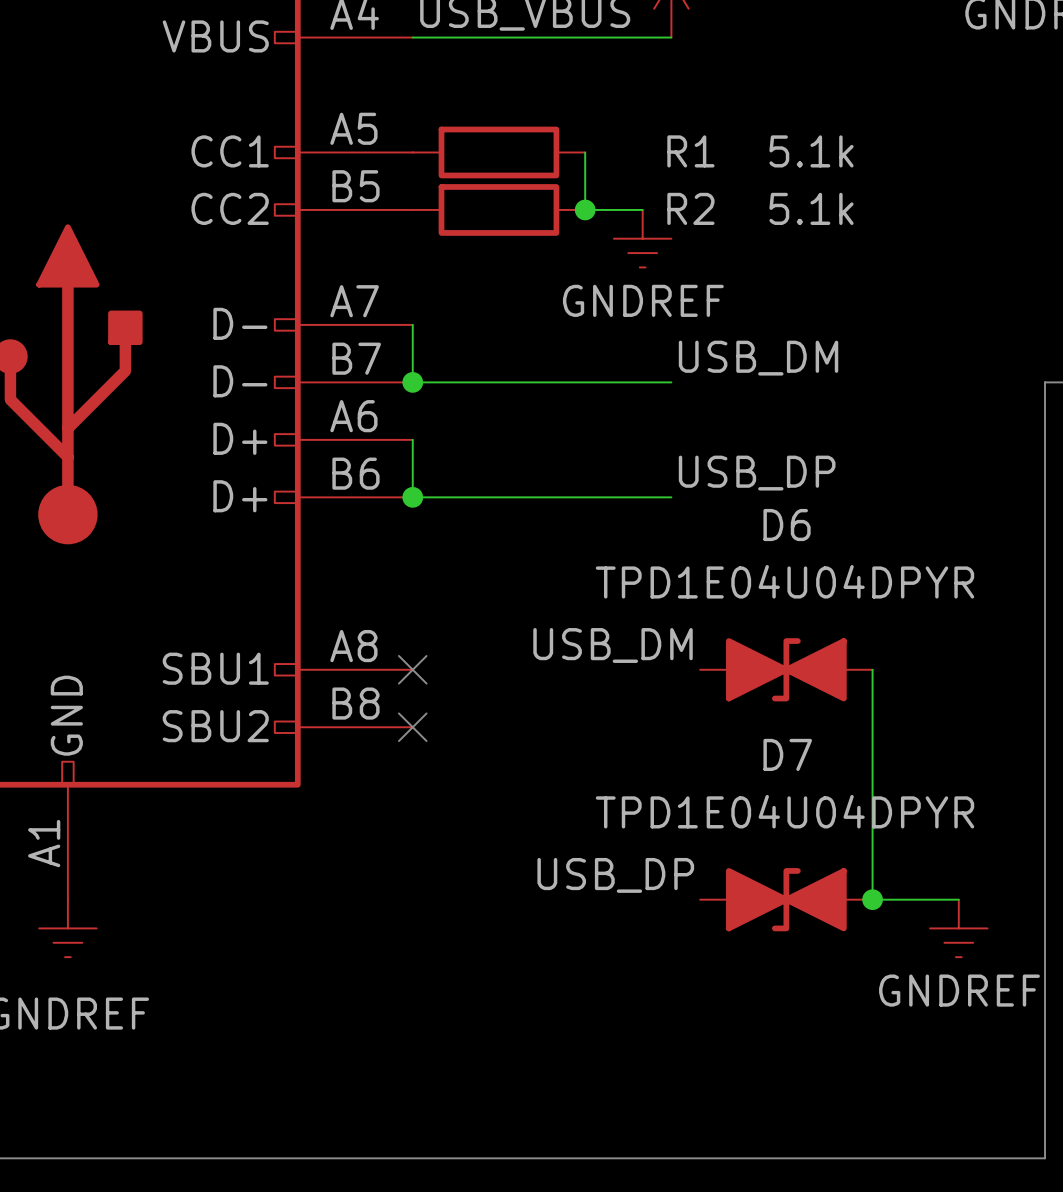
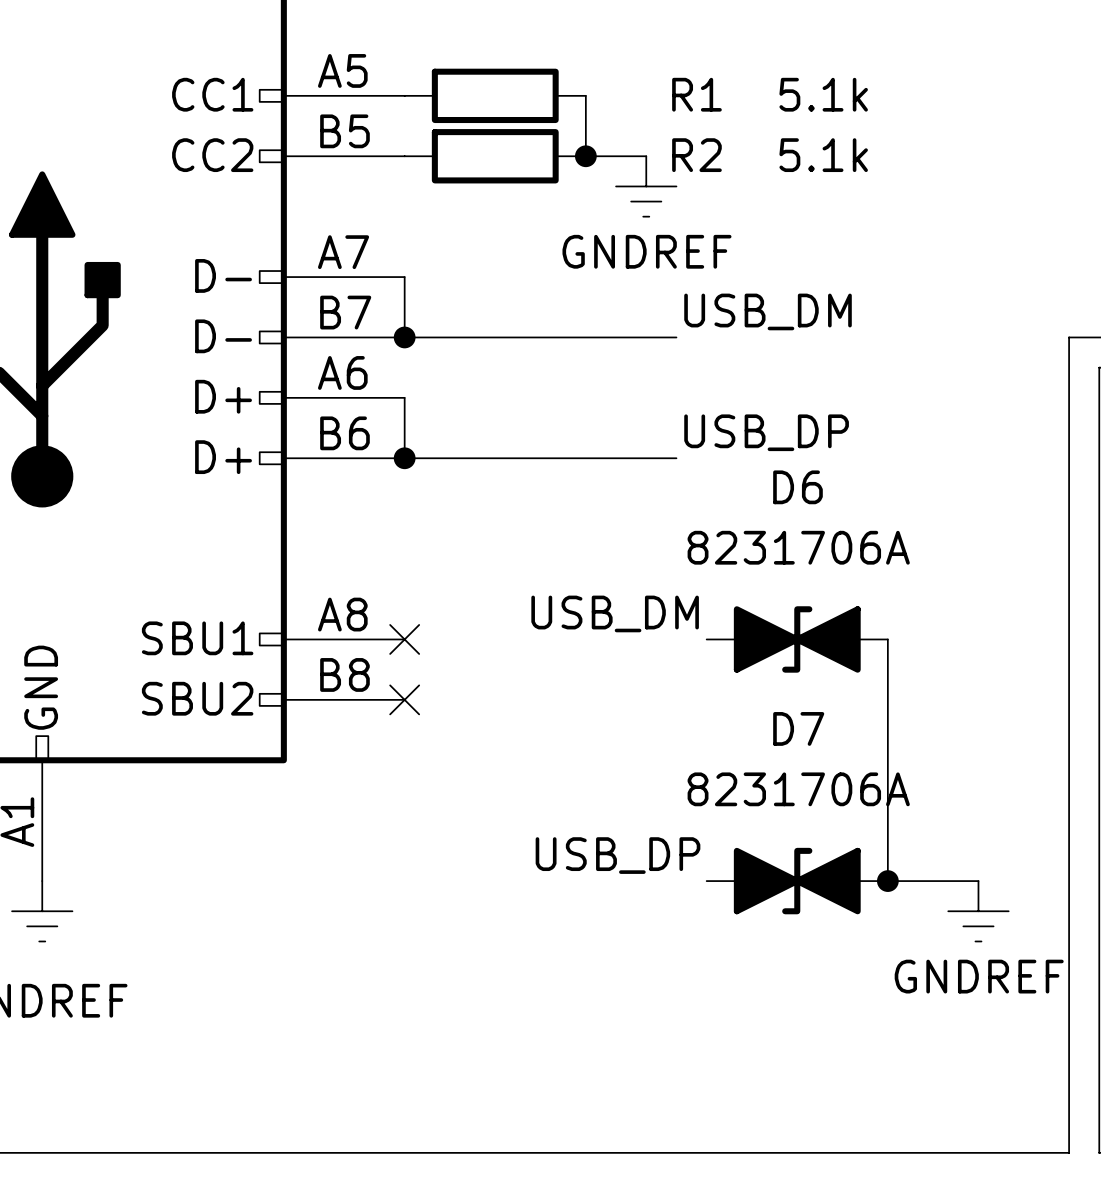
D6 value: TPD1E04U04DPYR (784, 581) -> 8231706A (798, 547)
D7 value: TPD1E04U04DPYR (784, 811) -> 8231706A (798, 789)

